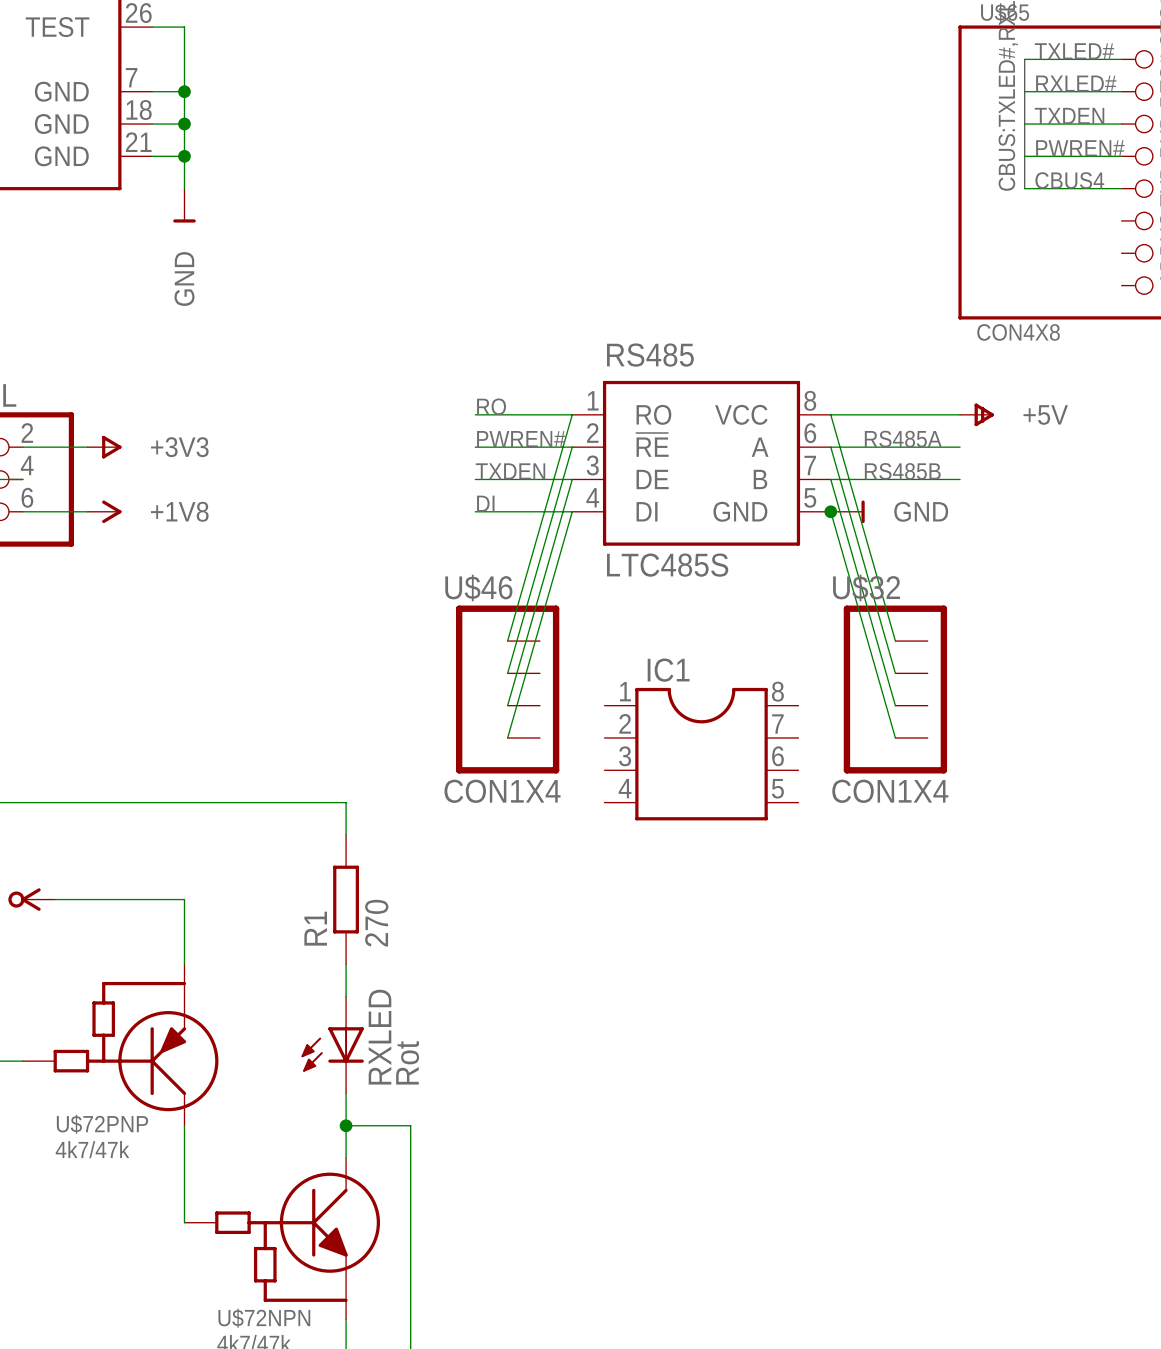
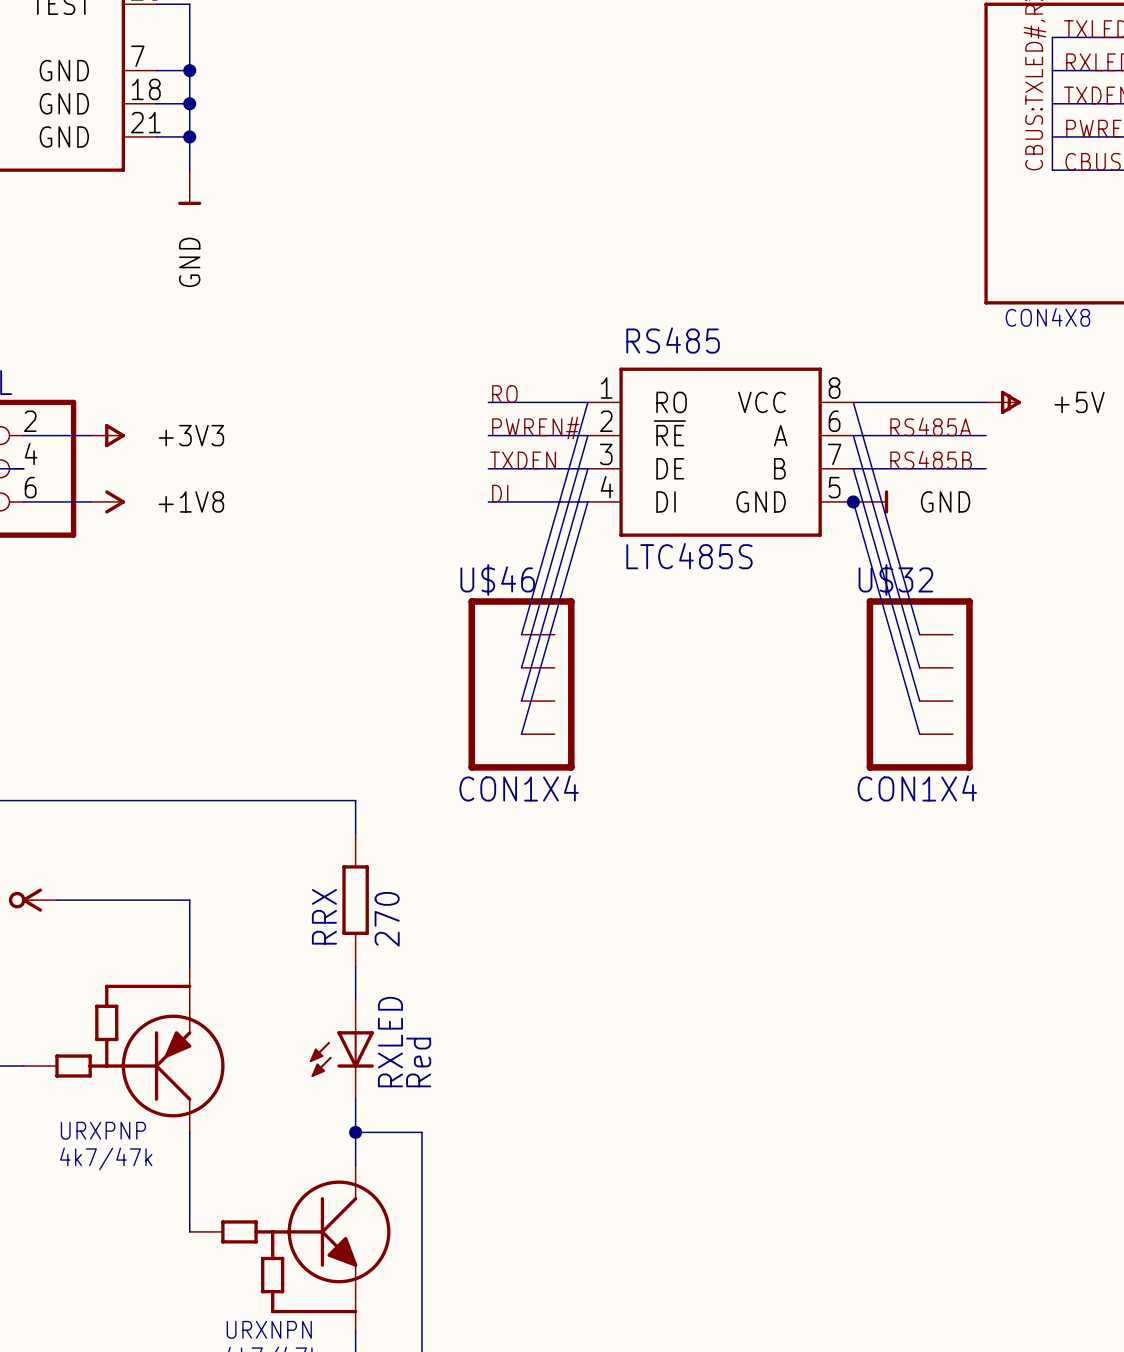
IC1: (701, 754) -> none
R1 name: R1 (315, 928) -> RRX (324, 916)
RXLED value: Rot (407, 1062) -> Red (418, 1062)
U$72PNP name: U$72PNP (102, 1124) -> URXPNP (103, 1130)
U$72NPN name: U$72NPN (264, 1318) -> URXNPN (269, 1329)

